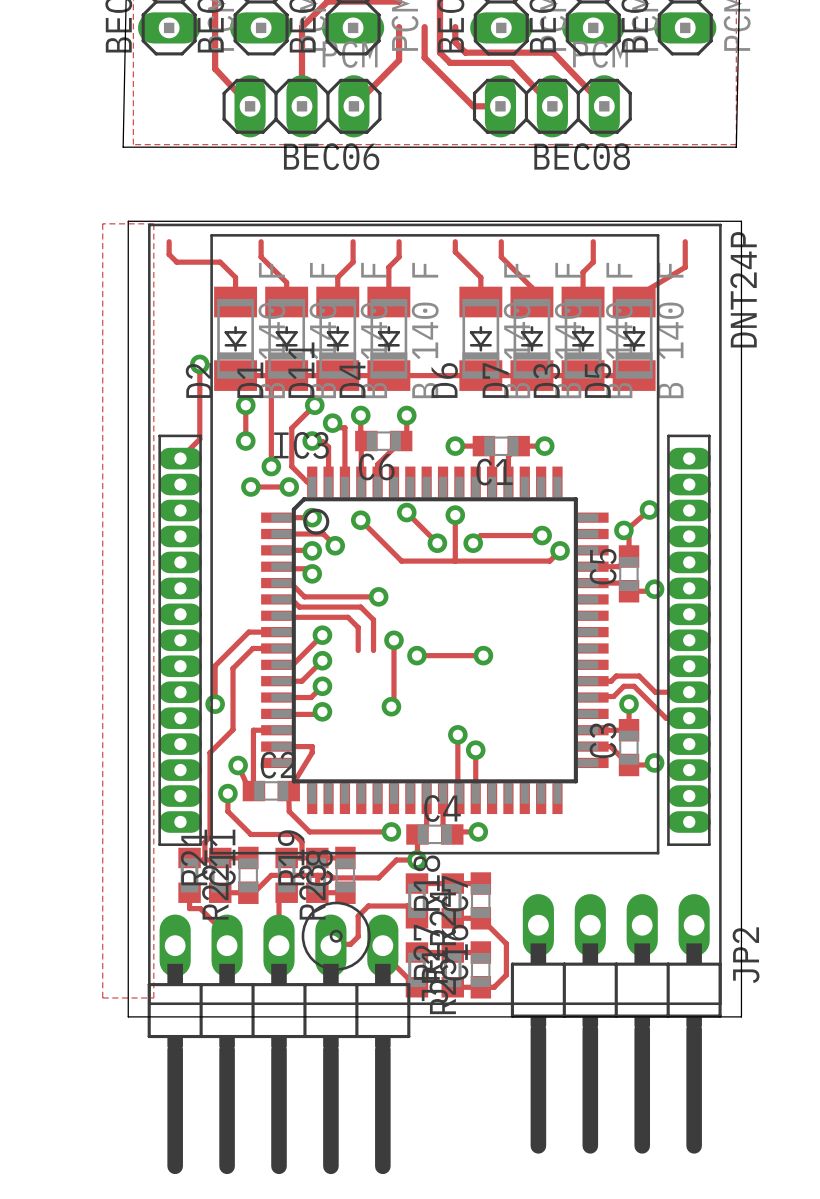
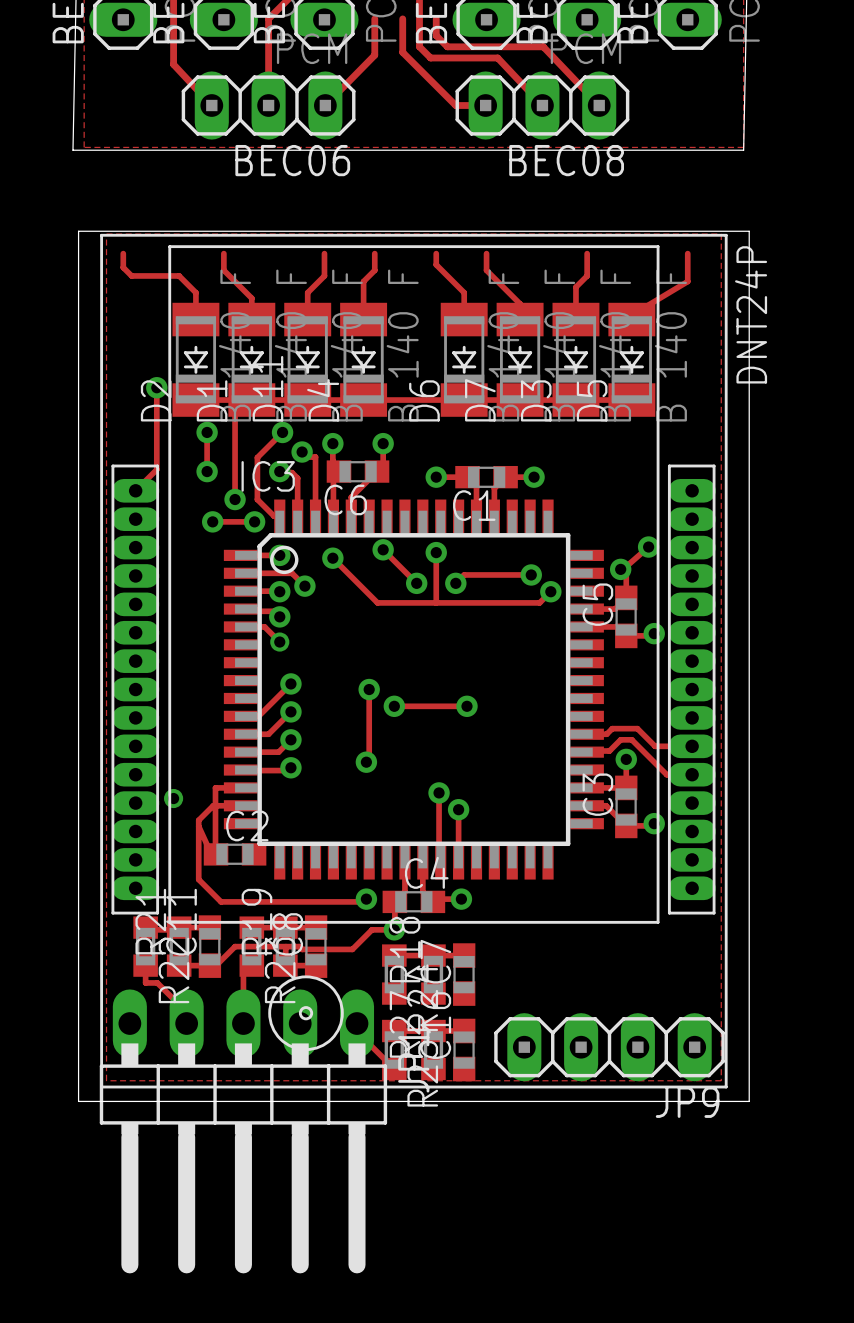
zone outline: (153, 223) (102, 223) (102, 998) (153, 998) -> (106, 234) (721, 234) (721, 1080) (106, 1080)
track: (290, 583) (304, 596) (378, 596) -> (256, 626) (264, 626) (279, 642)
via: none -> (279, 642)
via: (378, 596) -> none
track: (276, 599) (291, 599) (299, 607) (360, 607) (373, 619) (373, 650) -> none
track: (276, 615) (347, 617) (358, 627) (358, 650) -> none
track: (276, 632) (248, 632) (215, 665) (215, 704) -> none
track: (276, 648) (252, 648) (233, 668) (233, 729) (210, 752) (210, 837) (204, 842) (204, 860) -> none
via: (215, 704) -> none
via: none -> (173, 798)
track: (276, 746) (312, 746) (312, 752) (288, 791) (289, 811) (309, 831) (391, 831) -> none
via: (238, 765) -> none
track: (227, 793) (227, 811) (250, 834) (258, 834) -> (240, 805) (213, 805) (198, 820) (198, 879) (221, 901)
via: (227, 793) -> none
track: (294, 834) (302, 842) (302, 857) -> (260, 901) (366, 901)
track: (416, 918) (407, 906) (368, 906) (358, 916) (358, 936) (350, 944) (330, 944) (330, 938) (330, 945) -> none
track: (452, 918) (480, 918) (506, 943) (506, 975) (494, 987) (452, 987) -> none
JP9: none -> (609, 1047)
JP2: (616, 1023) -> none

